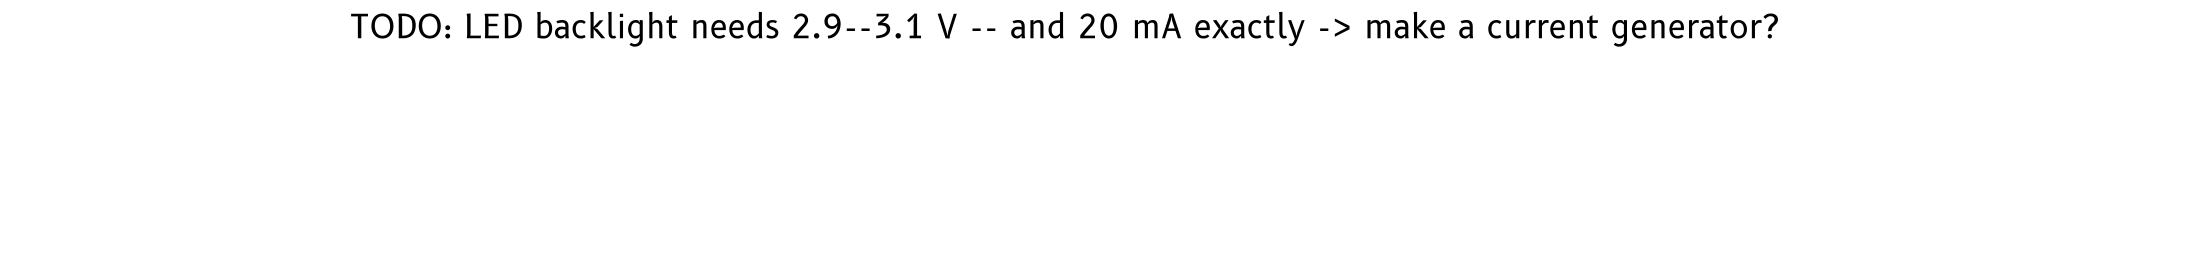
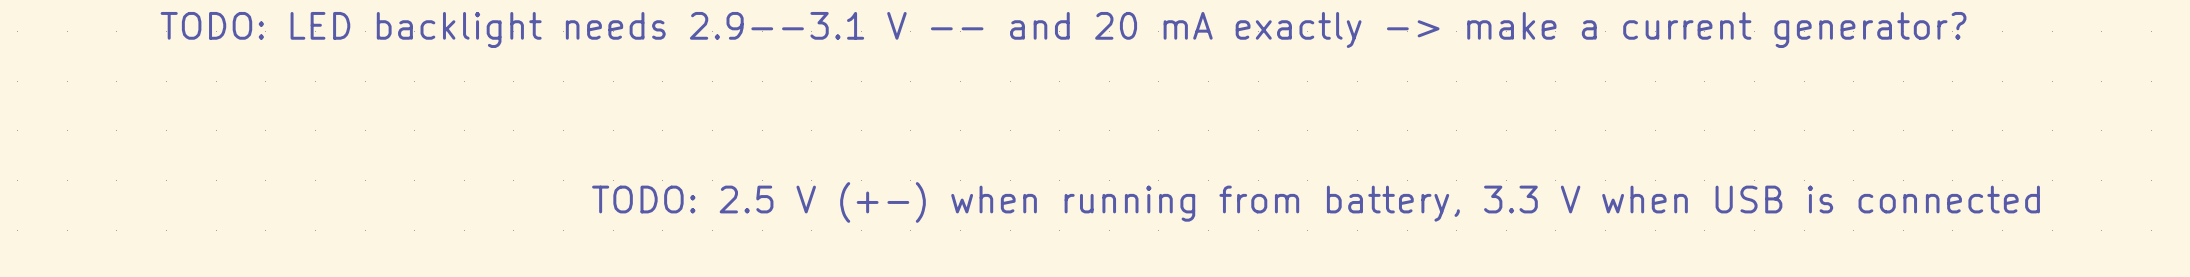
text: none -> TODO: 2.5 V (+-) when running from battery, 3.3 V when USB is connected (1315, 202)

